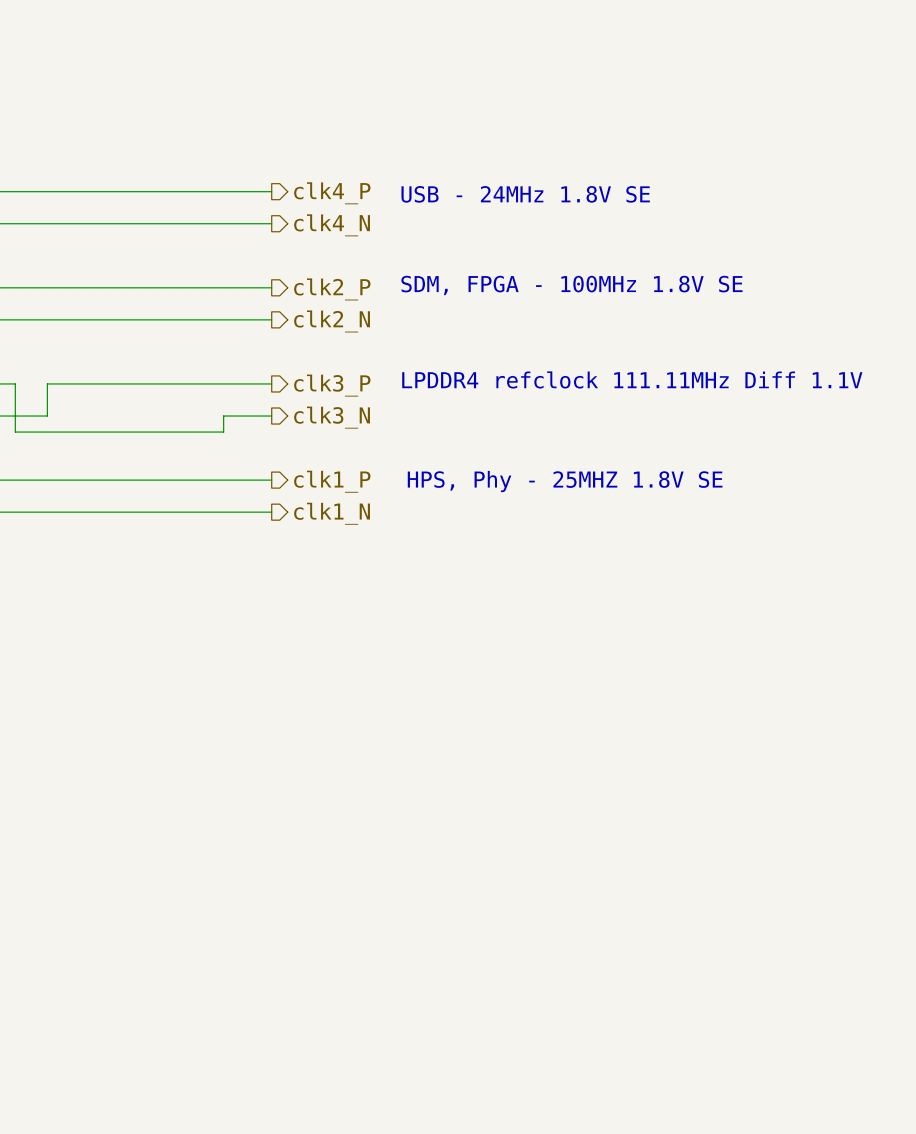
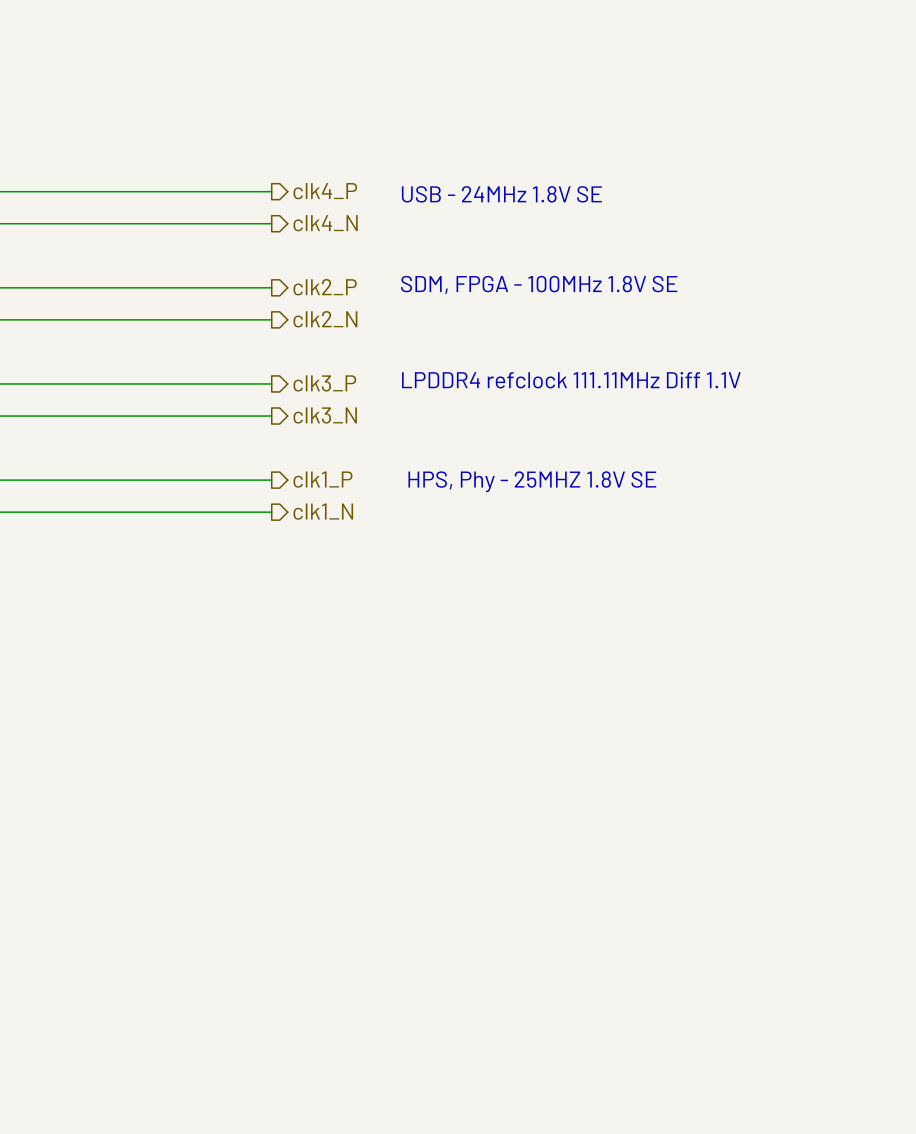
wire: (15, 383) (15, 432) (223, 432) (223, 416) -> (47, 416) (223, 416)
wire: (47, 383) (47, 416) -> (47, 383) (15, 383)

